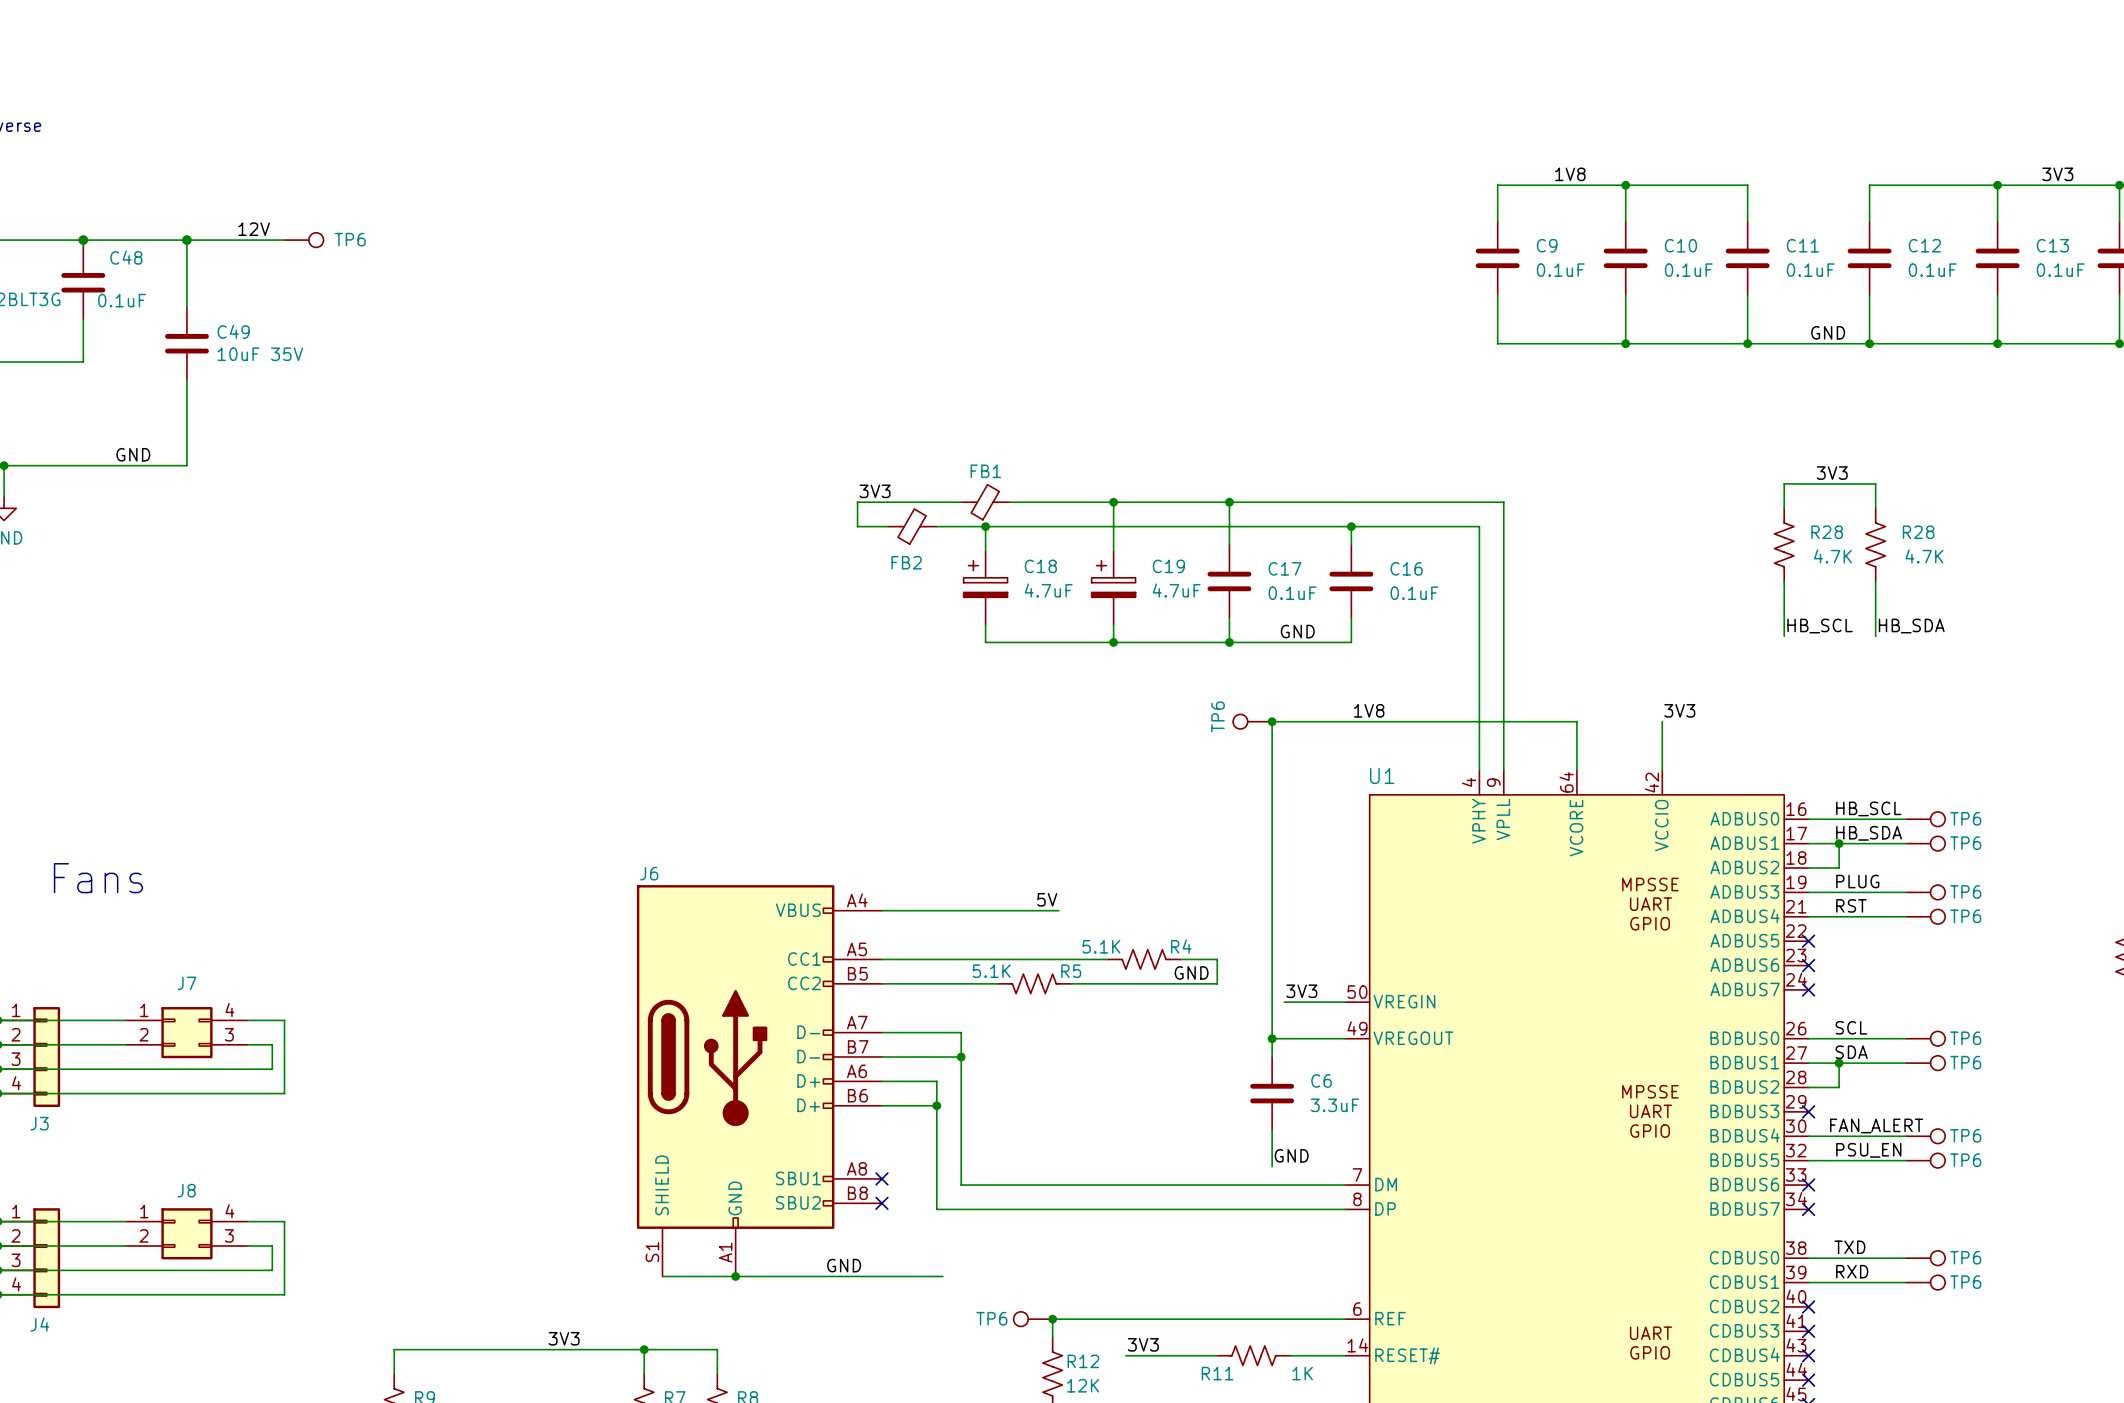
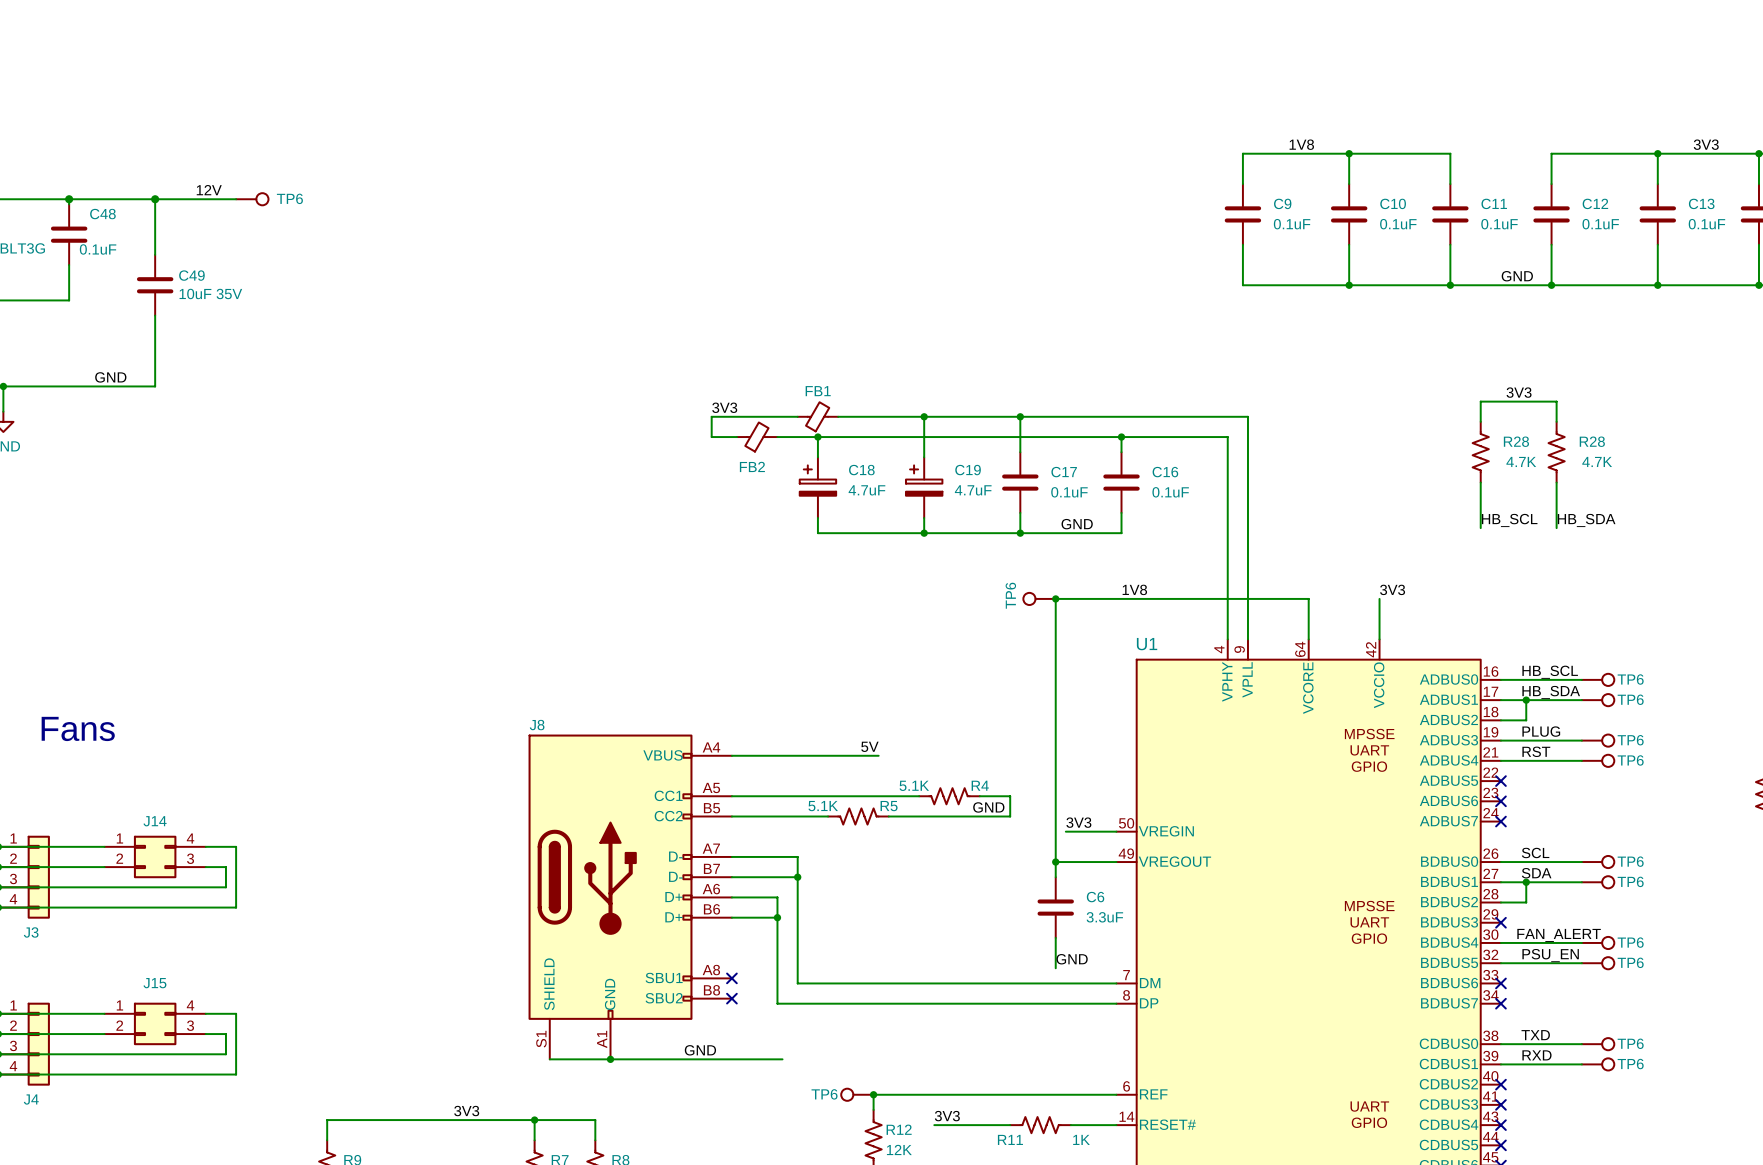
J6 name: J6 (649, 873) -> J8 (537, 725)
J7 name: J7 (186, 983) -> J14 (155, 821)
J8 name: J8 (186, 1190) -> J15 (154, 983)

